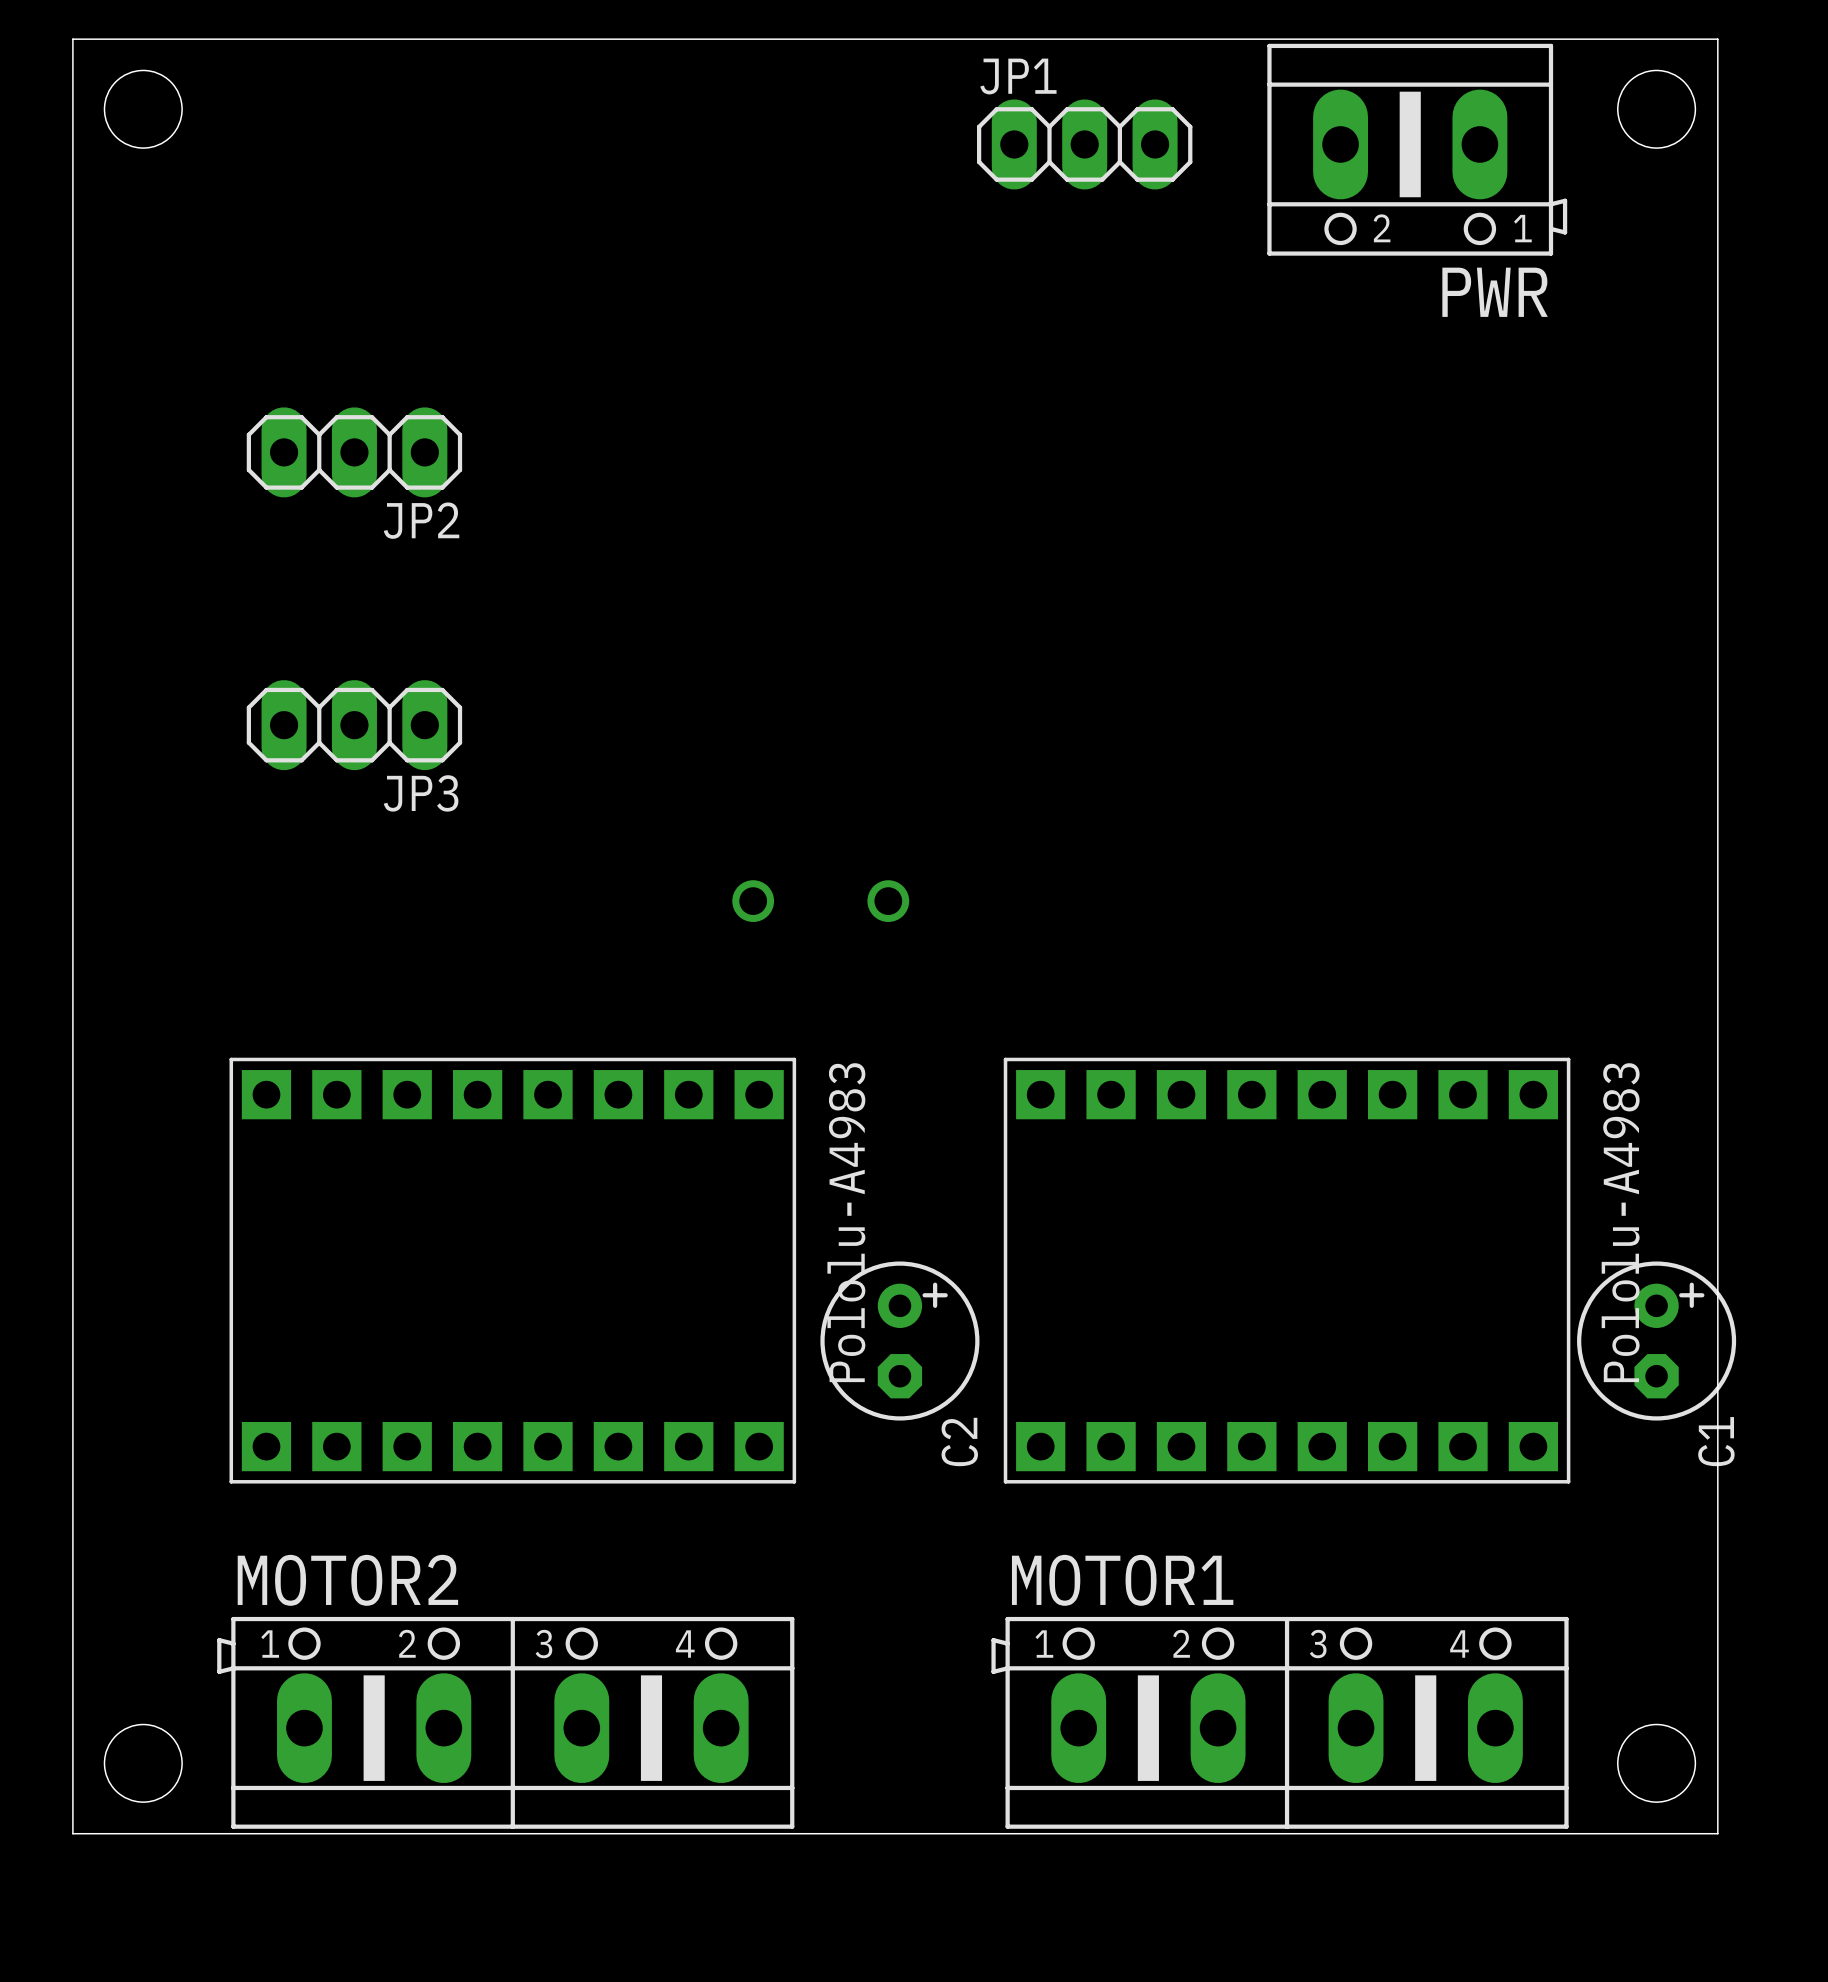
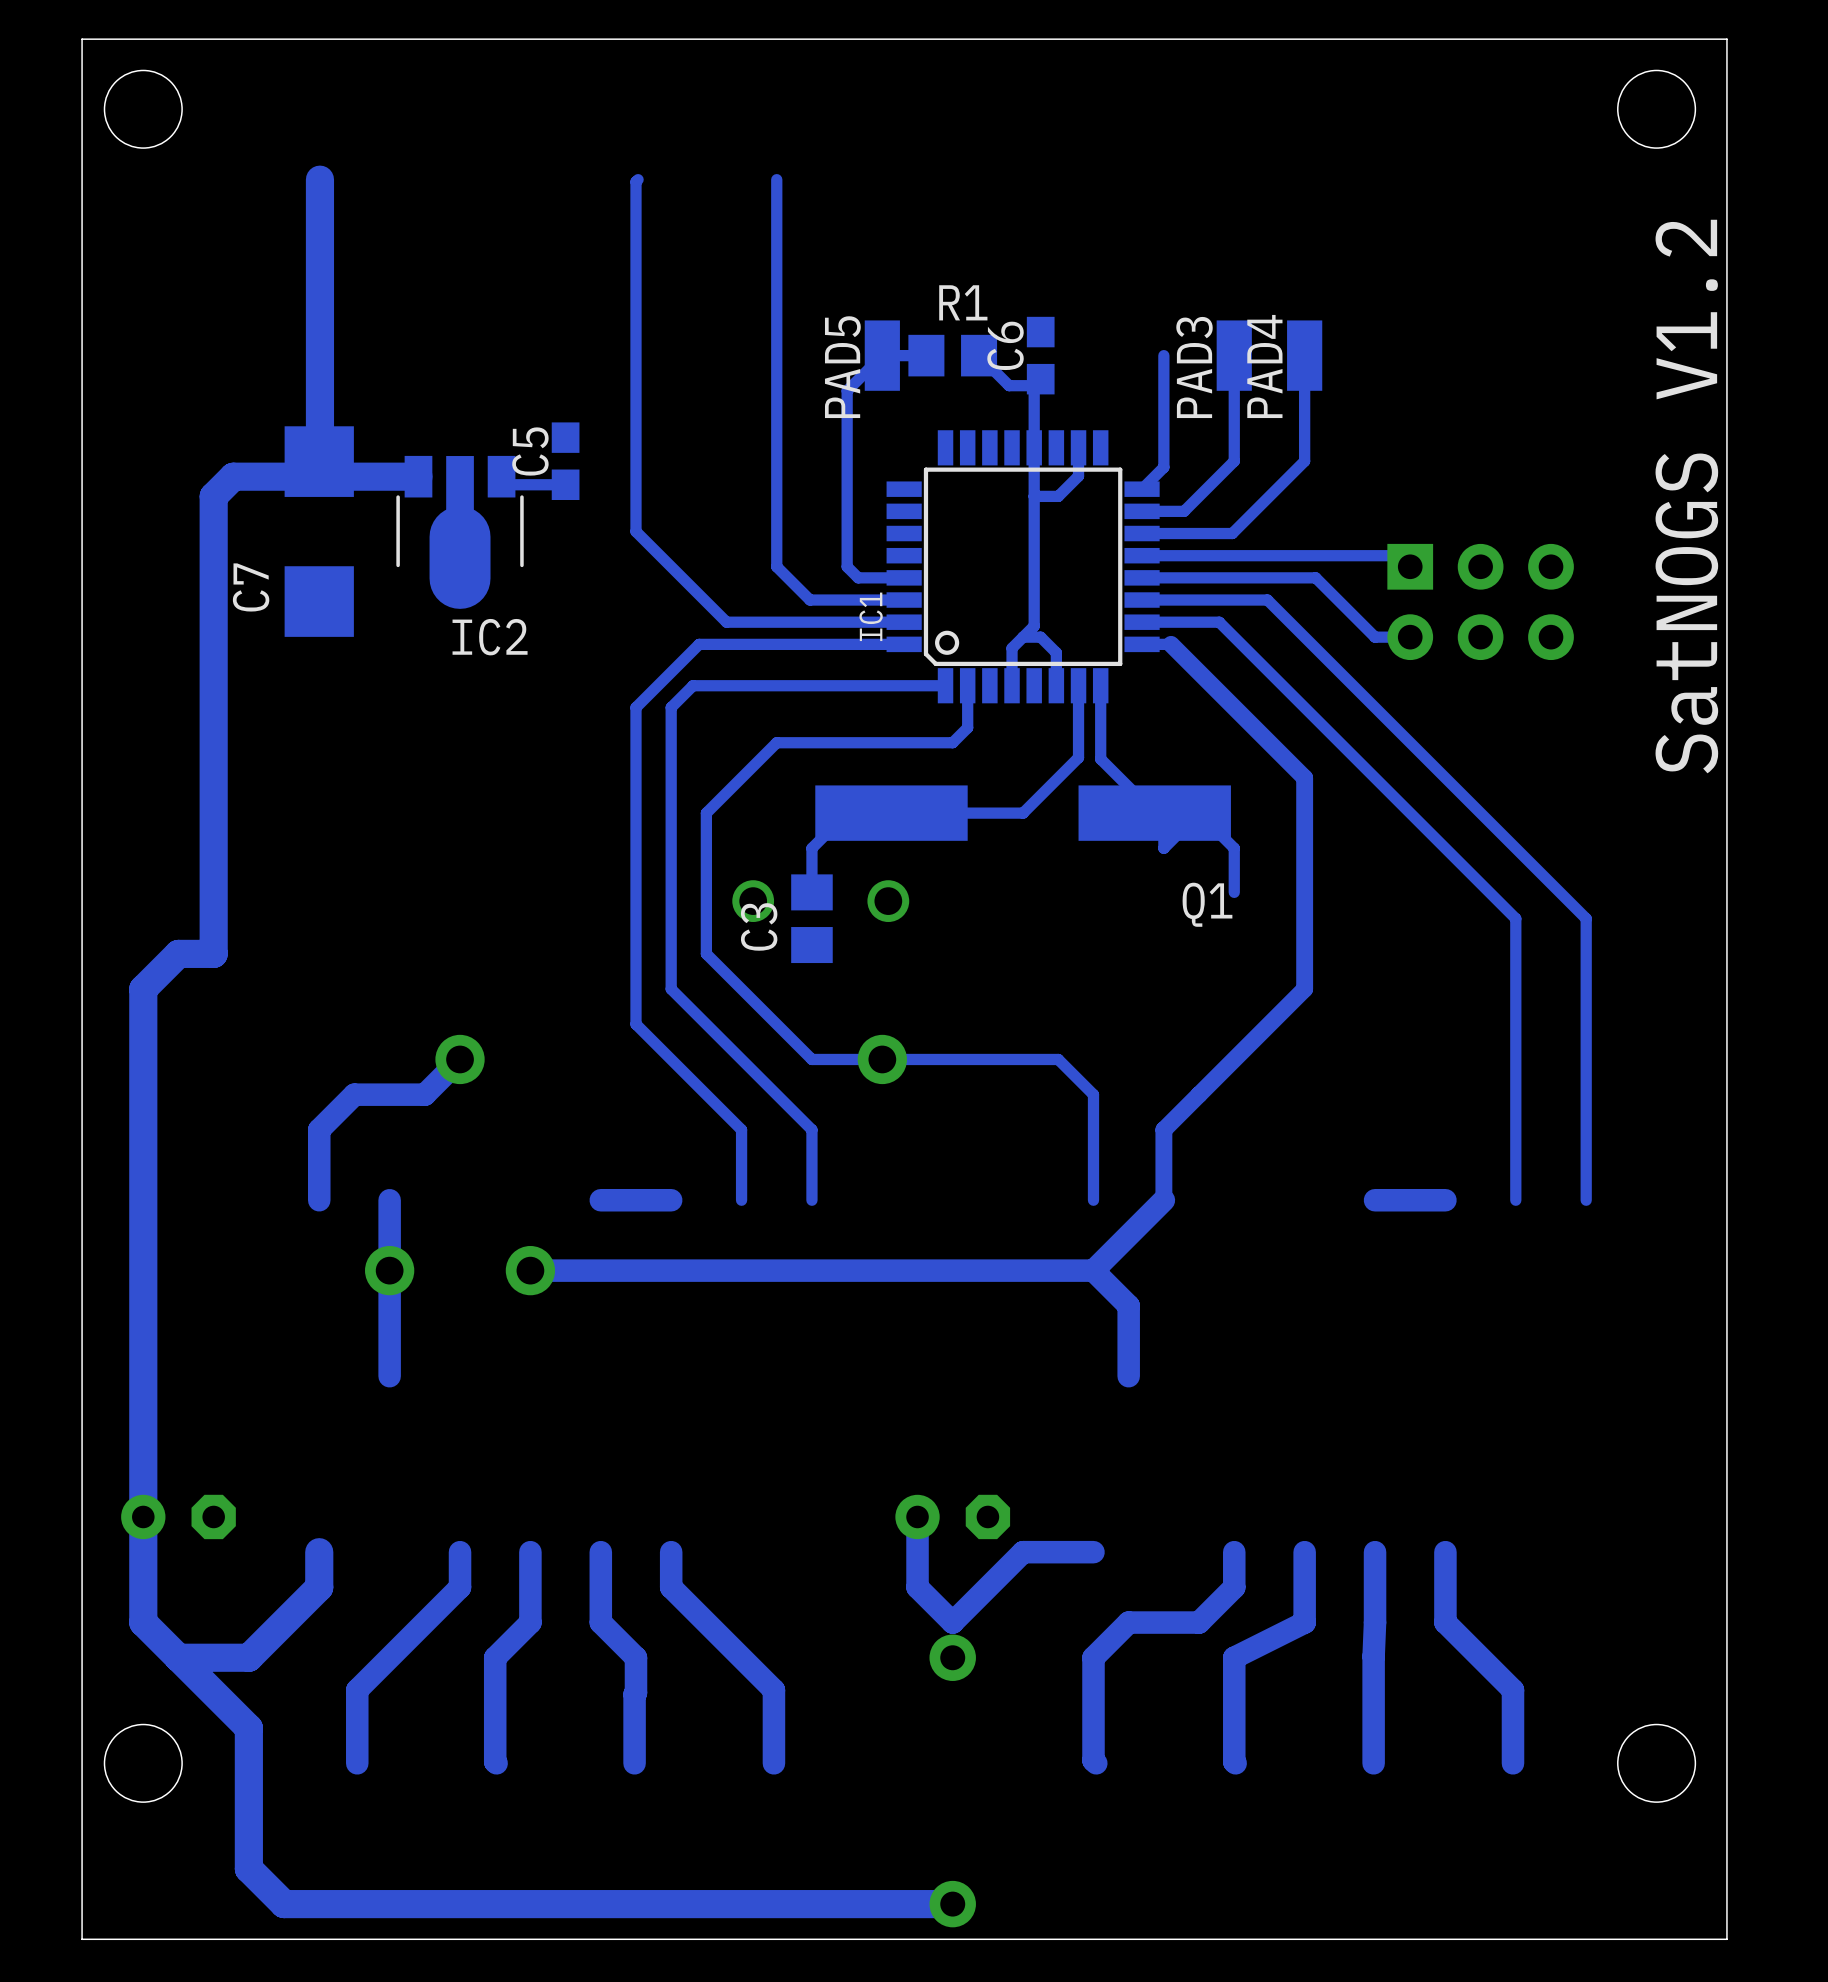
board edge: (1717, 39) (1717, 1833) (72, 1833) (72, 39) (82, 39) -> (1717, 39) (1726, 39) (1726, 1939) (82, 1939) (82, 39)
JP1: (1084, 144) -> none
PWR: (1417, 149) -> none
track: none -> (319, 179) (319, 461) (334, 476) (418, 476) (233, 476) (213, 496) (213, 953) (178, 953) (143, 989) (143, 1622) (248, 1728) (248, 1868) (284, 1904) (952, 1904)
track: none -> (638, 179) (635, 181) (635, 531) (726, 622) (904, 622)
track: none -> (776, 179) (776, 566) (810, 600) (904, 600)
PAD5: none -> (882, 355)
track: none -> (926, 355) (882, 355) (847, 390) (847, 566) (858, 577) (904, 577)
R1: none -> (952, 355)
track: none -> (979, 355) (1009, 385) (1034, 385)
C6: none -> (1040, 355)
track: none -> (1163, 355) (1163, 467) (1142, 489)
track: none -> (1234, 355) (1234, 461) (1184, 511) (1142, 511)
PAD3: none -> (1234, 355)
track: none -> (1304, 355) (1304, 461) (1232, 533) (1142, 533)
PAD4: none -> (1304, 355)
track: none -> (1034, 385) (1034, 626) (1012, 648) (1012, 685)
track: none -> (1078, 447) (1078, 476) (1058, 496) (1034, 496)
JP2: (354, 452) -> none
C5: none -> (565, 461)
track: none -> (501, 476) (509, 484) (565, 484)
text: none -> SatNOGS V1.2 (1686, 496)
C7: none -> (319, 531)
IC2: none -> (460, 532)
track: none -> (1142, 555) (1399, 555) (1410, 566)
IC1: none -> (1023, 566)
track: none -> (1142, 577) (1315, 577) (1375, 637) (1410, 637)
track: none -> (1142, 600) (1267, 600) (1586, 918) (1586, 1200)
part: none -> (1480, 601)
track: none -> (1142, 622) (1219, 622) (1515, 918) (1515, 1200)
track: none -> (1023, 637) (1040, 637) (1056, 652) (1056, 685)
track: none -> (904, 644) (699, 644) (635, 707) (635, 1024) (741, 1129) (741, 1200)
track: none -> (1142, 644) (1171, 644) (1304, 777) (1304, 989) (1163, 1129) (1163, 1200) (1093, 1270)
track: none -> (945, 685) (693, 685) (671, 707) (671, 989) (811, 1129) (811, 1200)
track: none -> (967, 685) (967, 727) (952, 742) (776, 742) (706, 813) (706, 953) (811, 1059) (1058, 1059) (1093, 1094) (1093, 1200)
track: none -> (1078, 685) (1078, 757) (1023, 813) (847, 813) (811, 848) (811, 892)
track: none -> (1100, 685) (1100, 759) (1163, 822) (1163, 848) (1199, 813) (1234, 848) (1234, 892)
JP3: (354, 725) -> none
Q1: none -> (1023, 813)
C3: none -> (811, 918)
track: none -> (460, 1059) (424, 1094) (354, 1094) (319, 1129) (319, 1200)
via: none -> (460, 1059)
via: none -> (882, 1059)
track: none -> (389, 1200) (389, 1376)
track: none -> (671, 1200) (600, 1200)
track: none -> (1445, 1200) (1375, 1200)
via: none -> (389, 1270)
part: (512, 1270) -> none
via: none -> (530, 1270)
track: none -> (1093, 1270) (1128, 1305) (1128, 1376)
track: none -> (1093, 1270) (530, 1270)
part: (1287, 1270) -> none
C2 side: bottom (899, 1341) -> top (952, 1516)
C1: (1656, 1341) -> none
part: none -> (178, 1516)
track: none -> (917, 1516) (917, 1587) (952, 1622) (1023, 1552) (1093, 1552)
track: none -> (319, 1552) (319, 1587) (248, 1657) (178, 1657)
track: none -> (460, 1552) (460, 1587) (357, 1690) (357, 1763)
track: none -> (530, 1552) (530, 1622) (495, 1657) (496, 1763)
track: none -> (600, 1552) (600, 1622) (635, 1657) (634, 1763)
track: none -> (671, 1552) (671, 1587) (773, 1690) (773, 1763)
track: none -> (1234, 1552) (1234, 1587) (1199, 1622) (1128, 1622) (1093, 1657) (1093, 1760) (1096, 1763)
track: none -> (1304, 1552) (1304, 1622) (1234, 1657) (1235, 1763)
track: none -> (1375, 1552) (1373, 1763)
track: none -> (1445, 1552) (1445, 1622) (1512, 1690) (1512, 1763)
via: none -> (952, 1657)
MOTOR2: (505, 1722) -> none
MOTOR1: (1280, 1722) -> none
via: none -> (952, 1904)

